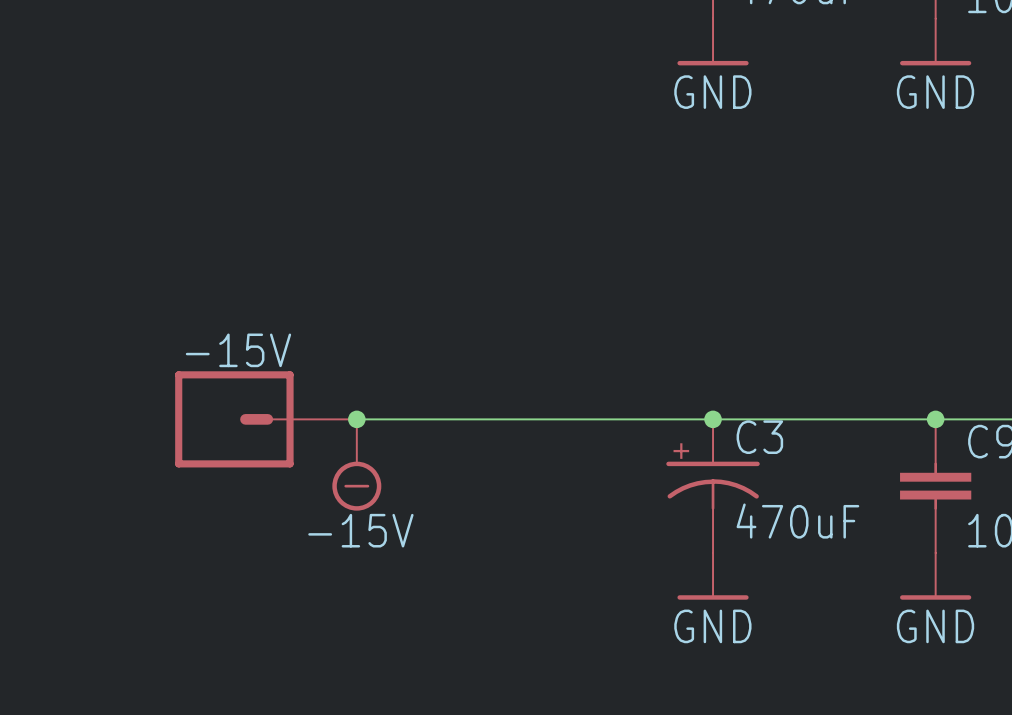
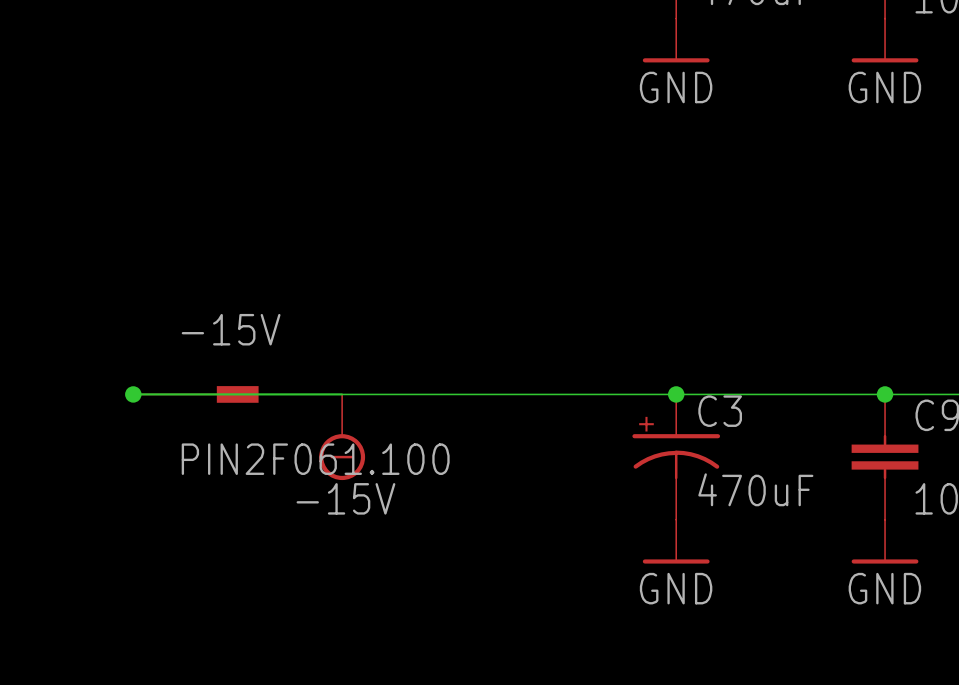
-15V symbol: [175, 371, 357, 468] -> [133, 386, 259, 403]
junction: none -> (133, 394)
junction: (356, 419) -> none
-15V value: none -> PIN2F061.100 (315, 459)

